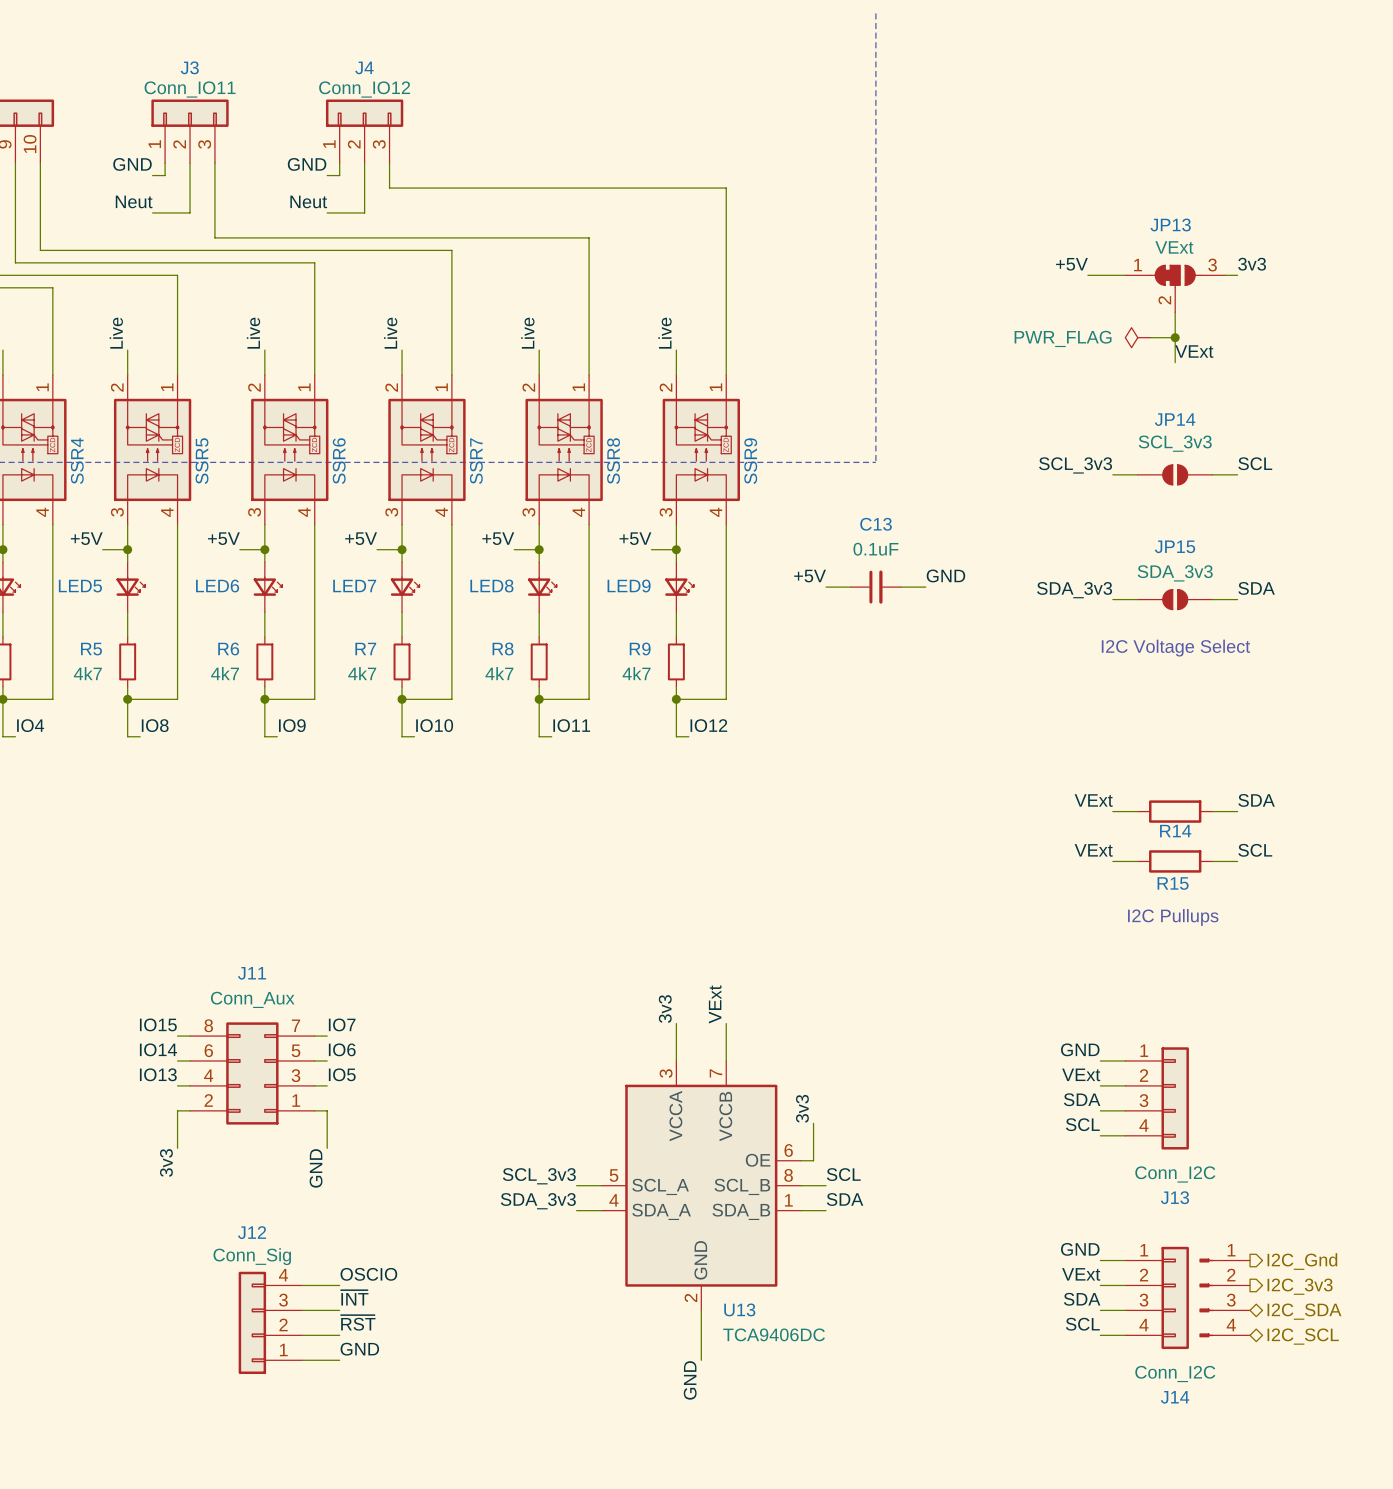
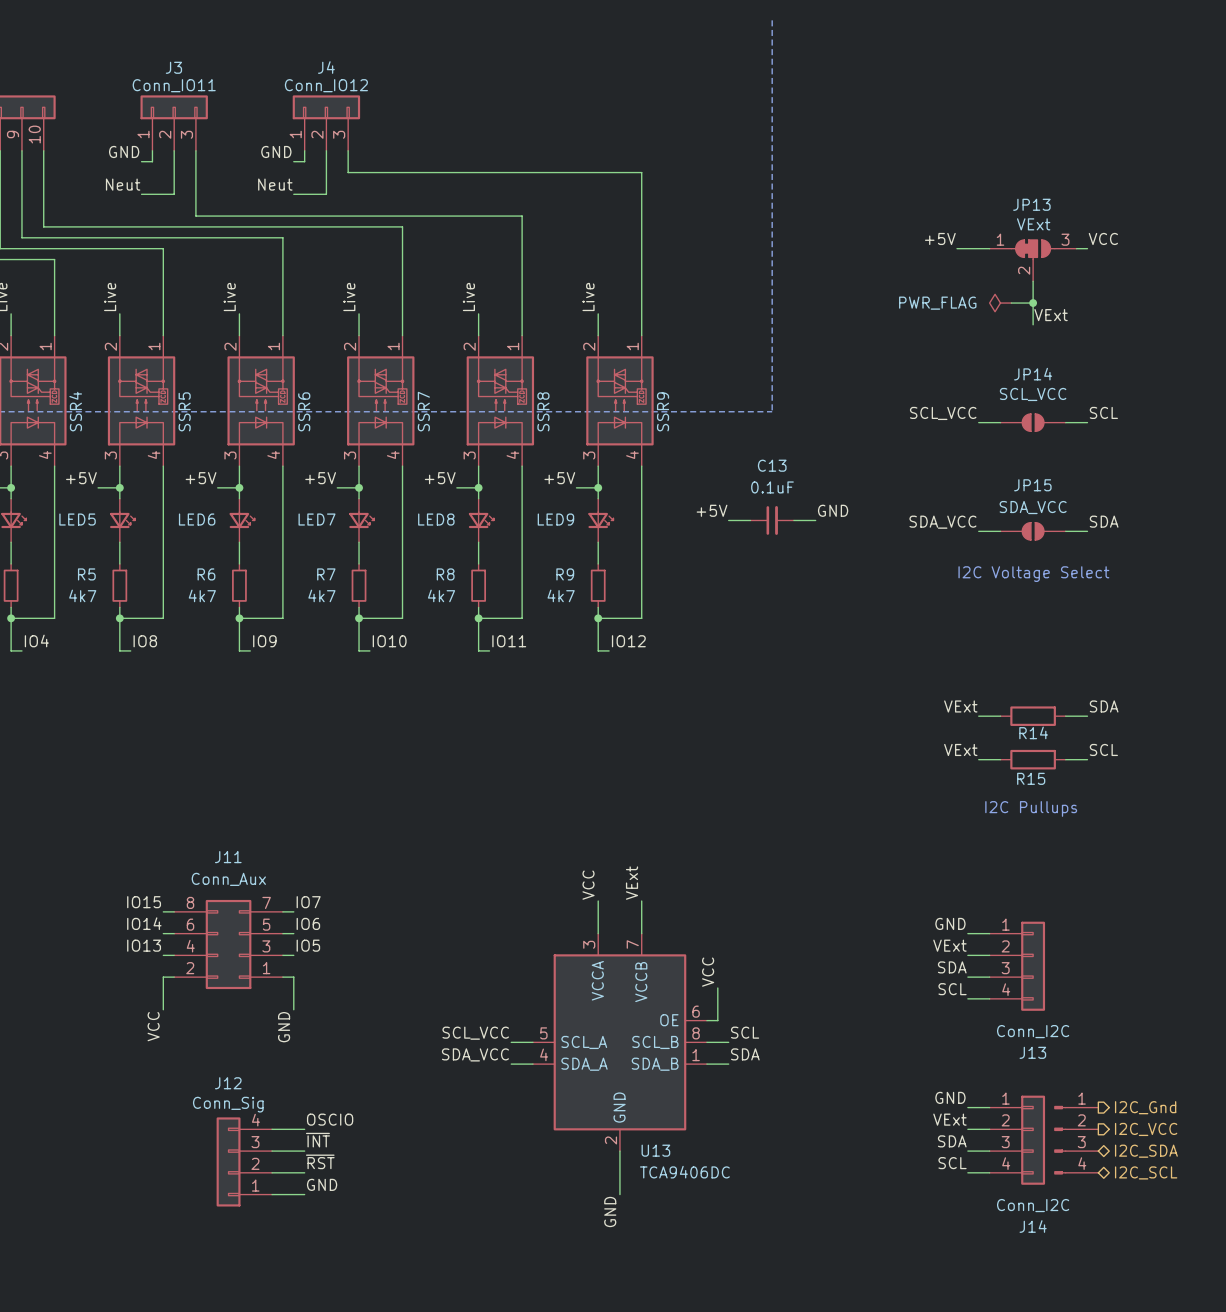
label: 3v3 (1252, 264) -> VCC (1103, 238)
JP14 value: SCL_3v3 (1175, 443) -> SCL_VCC (1033, 394)
label: SCL_3v3 (1075, 465) -> SCL_VCC (943, 413)
JP15 value: SDA_3v3 (1175, 573) -> SDA_VCC (1033, 507)
label: SDA_3v3 (1074, 590) -> SDA_VCC (942, 522)
label: 3v3 (665, 1009) -> VCC (588, 885)
label: 3v3 (802, 1108) -> VCC (708, 972)
label: 3v3 (166, 1162) -> VCC (153, 1026)
label: SCL_3v3 (539, 1176) -> SCL_VCC (475, 1033)
label: SDA_3v3 (538, 1201) -> SDA_VCC (475, 1054)
hierarchical label: I2C_3v3 (1300, 1286) -> I2C_VCC (1146, 1129)

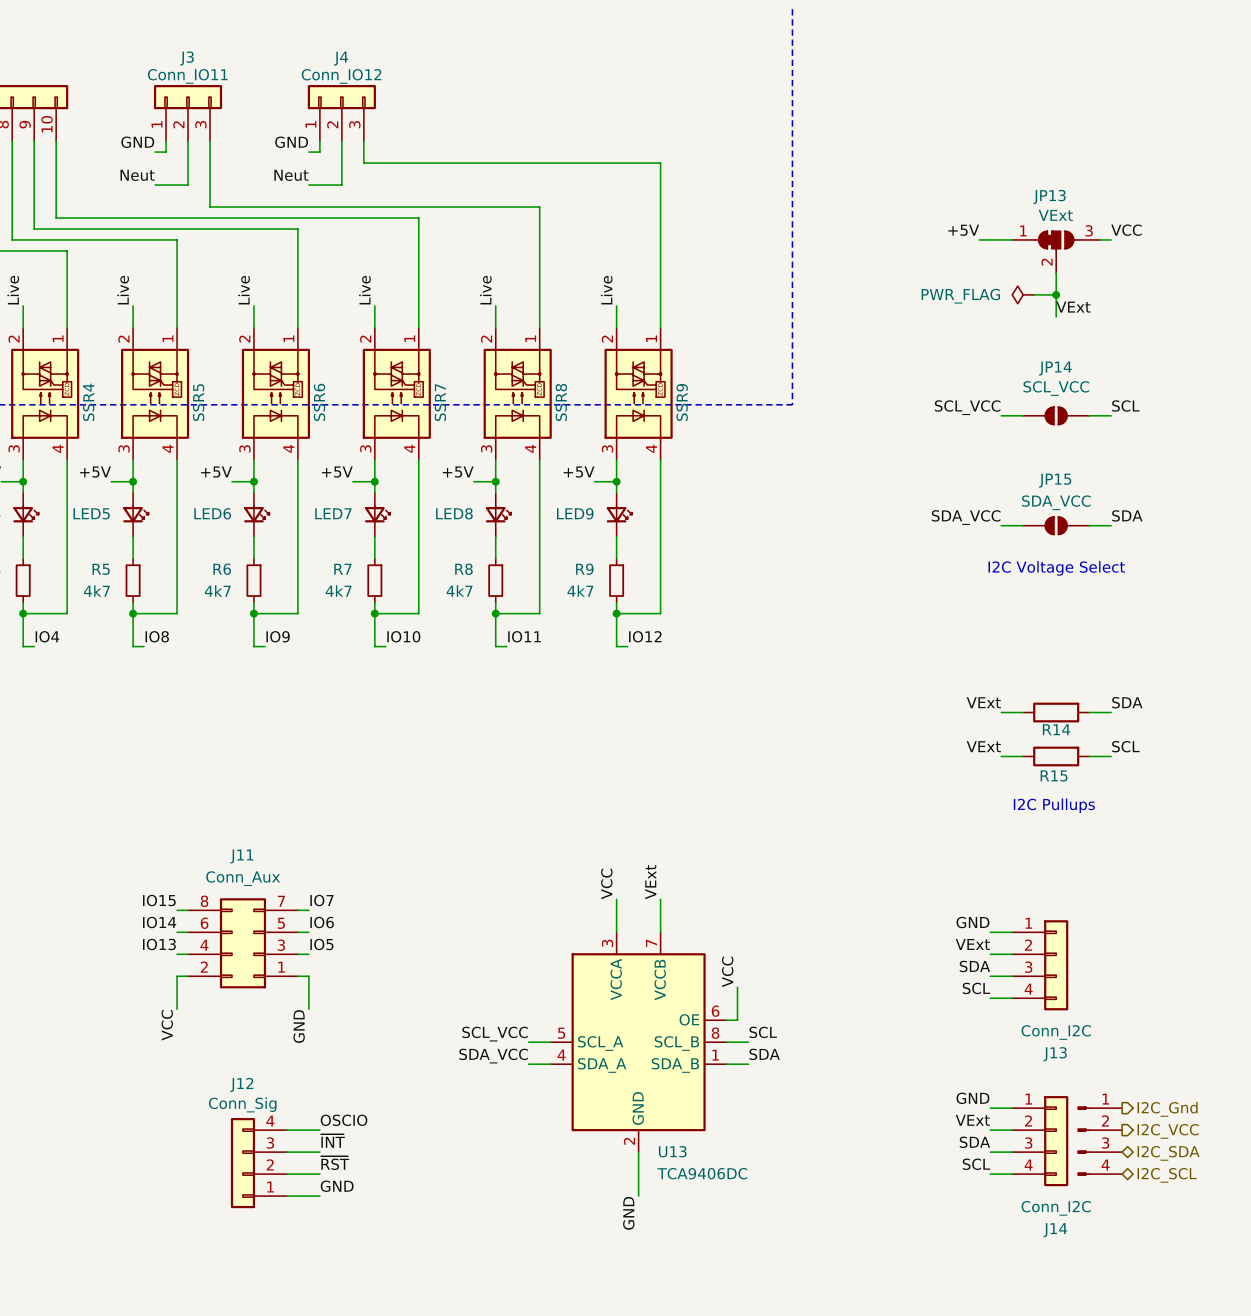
label: +5V (712, 510) -> none
label: GND (833, 510) -> none
wire: (728, 520) (750, 520) -> none
C13: 0.1uF (772, 520) -> none
wire: (793, 520) (815, 520) -> none

